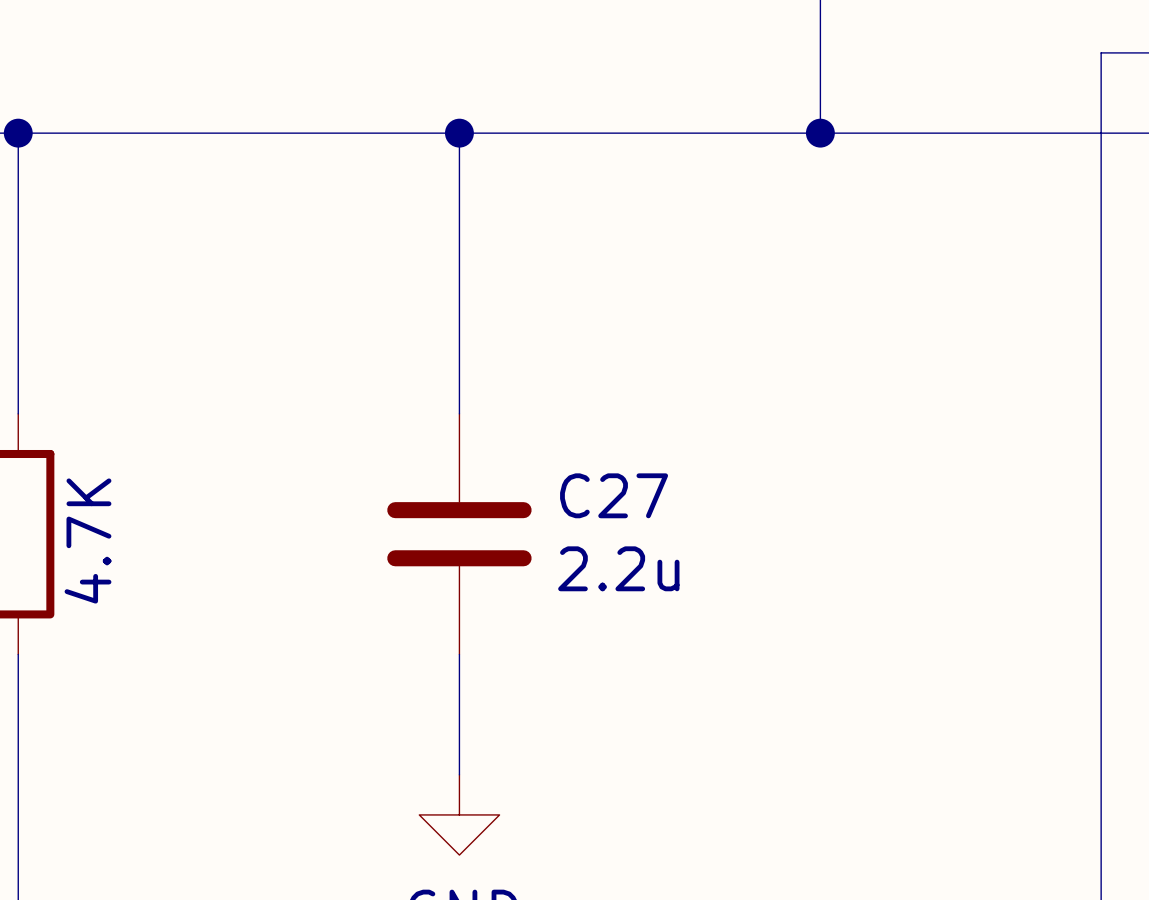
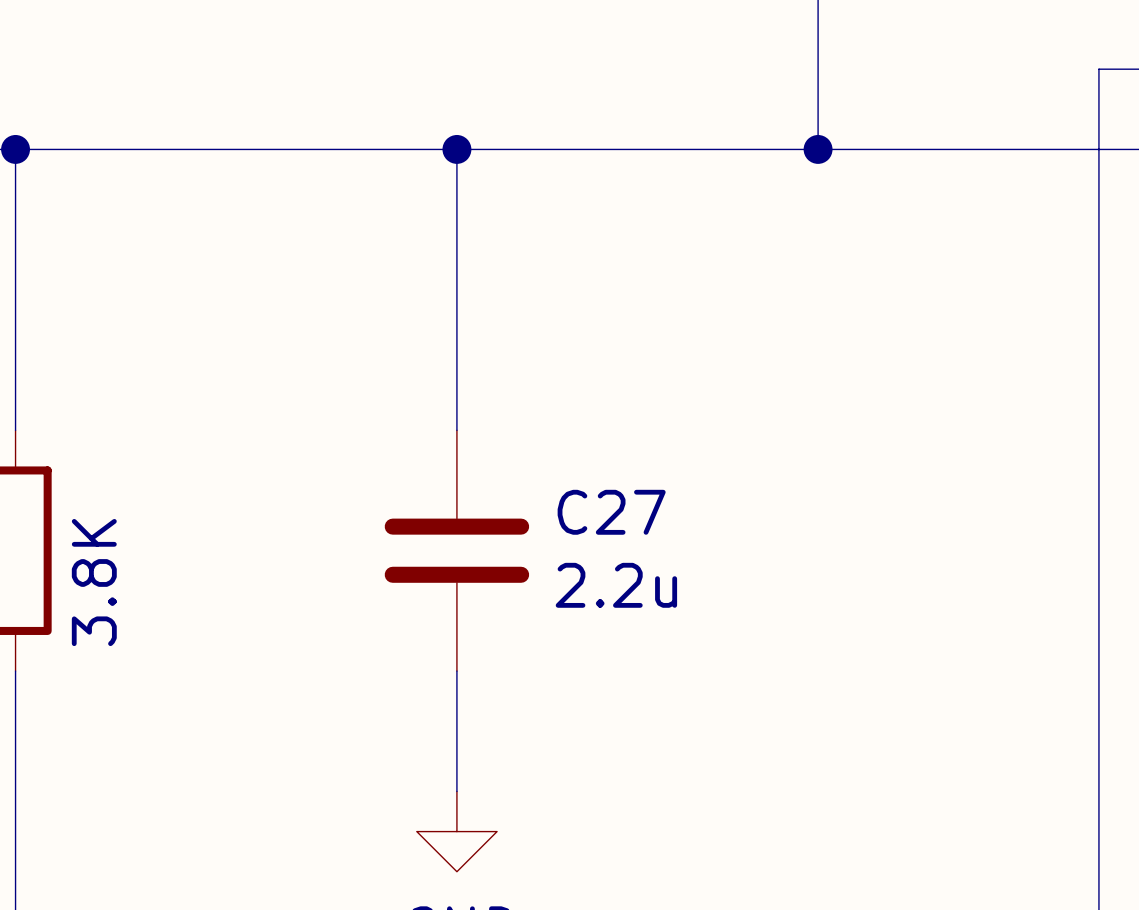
part value: 4.7K (87, 541) -> 3.8K (94, 582)

